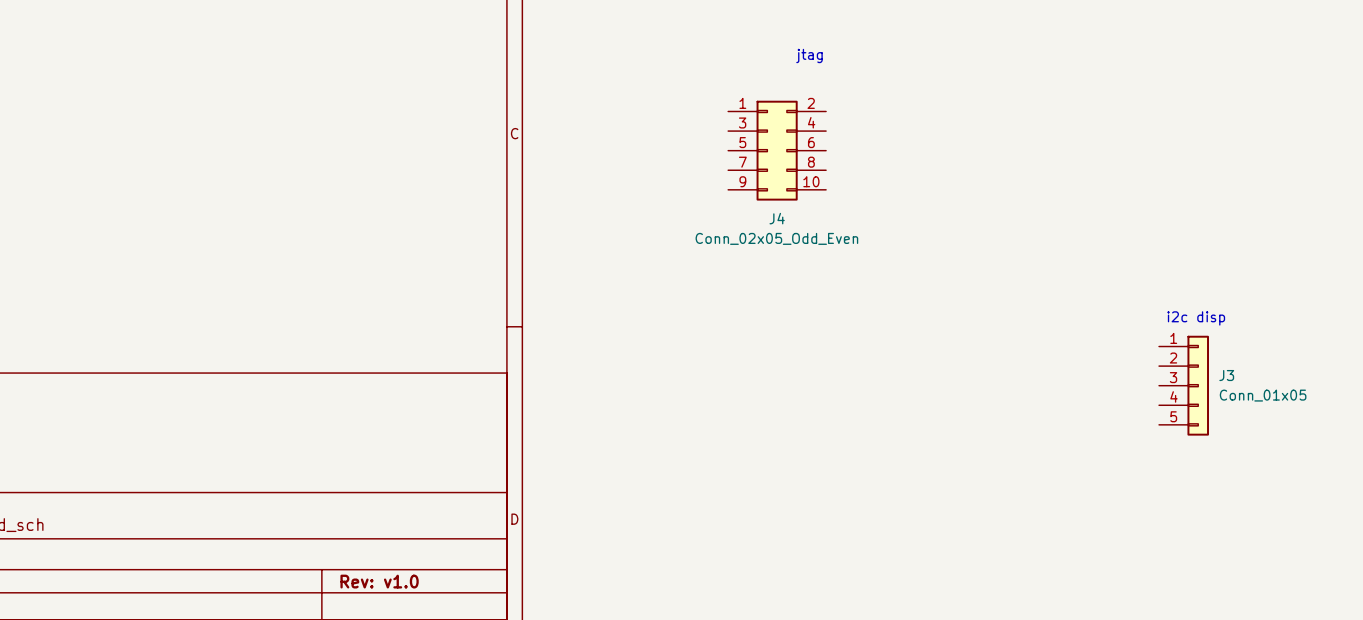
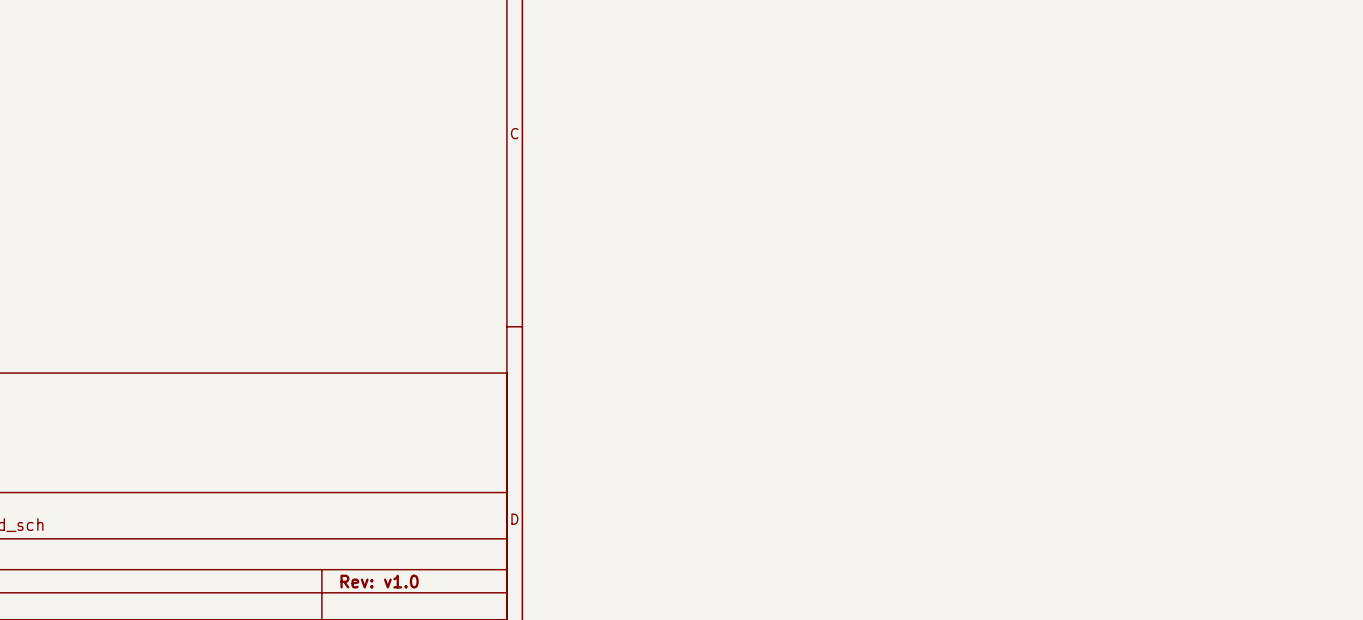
text: jtag (809, 55) -> none
J4: Conn_02x05_Odd_Even (777, 150) -> none
text: i2c disp (1196, 318) -> none
J3: Conn_01x05 (1184, 385) -> none

